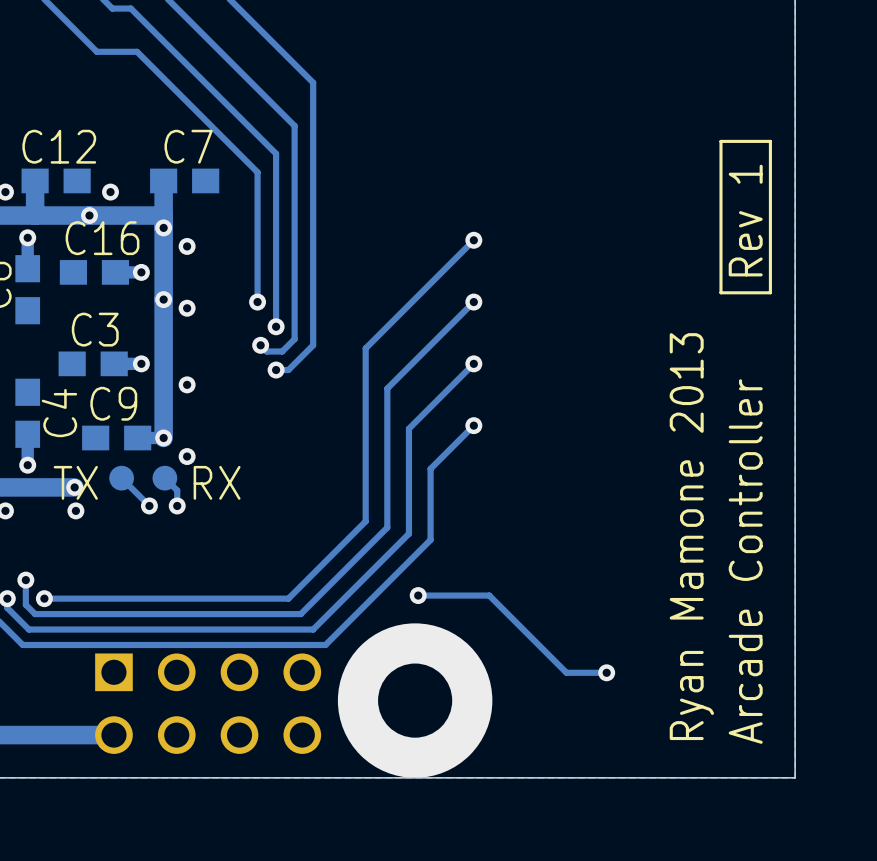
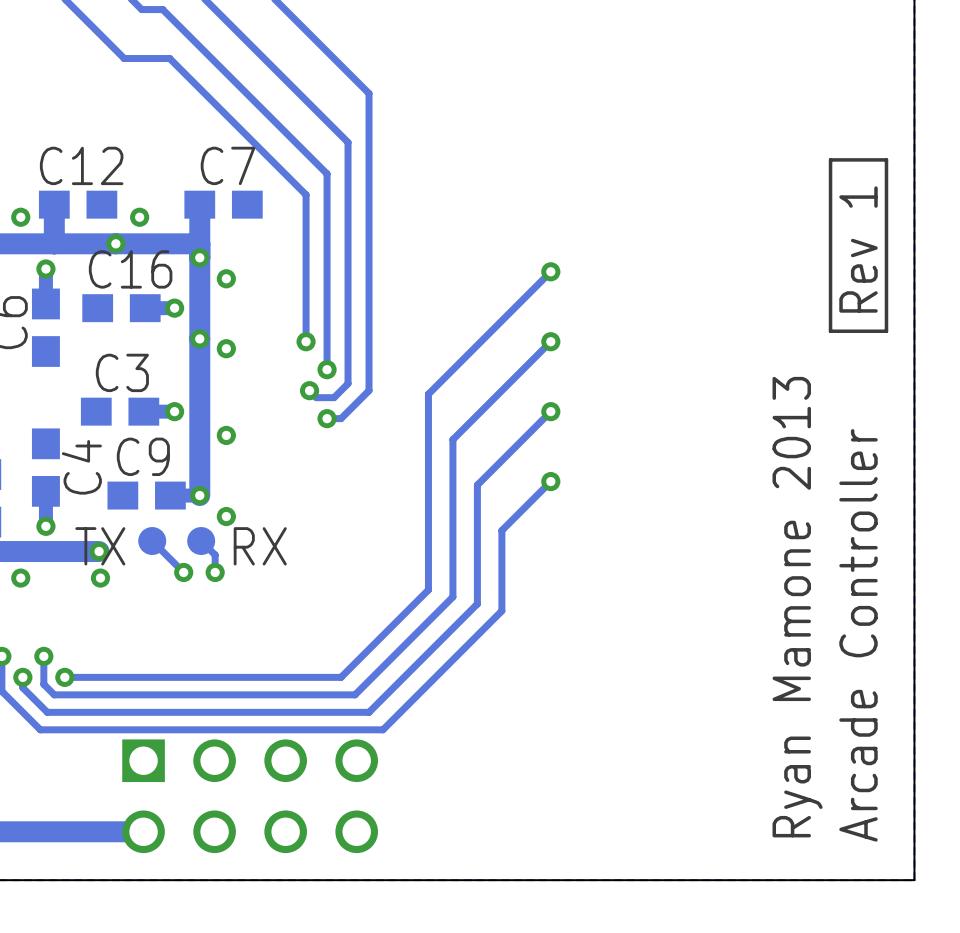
track: (418, 595) (489, 595) (566, 672) (606, 672) -> none
via: (418, 595) -> none
via: (606, 672) -> none
via: (415, 700) -> none

